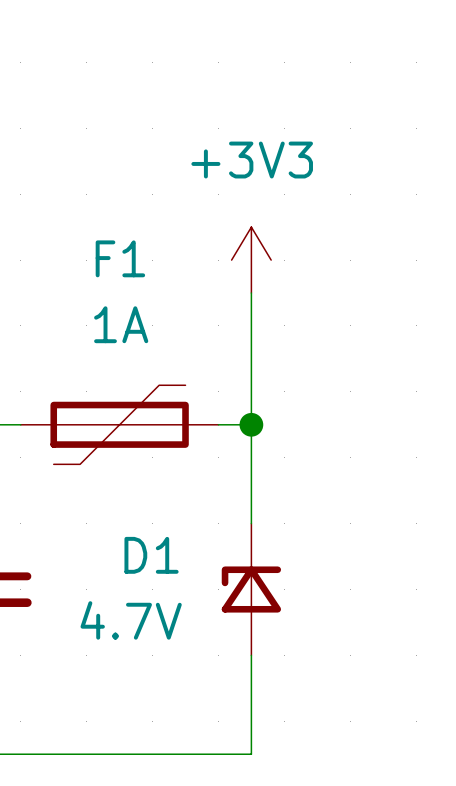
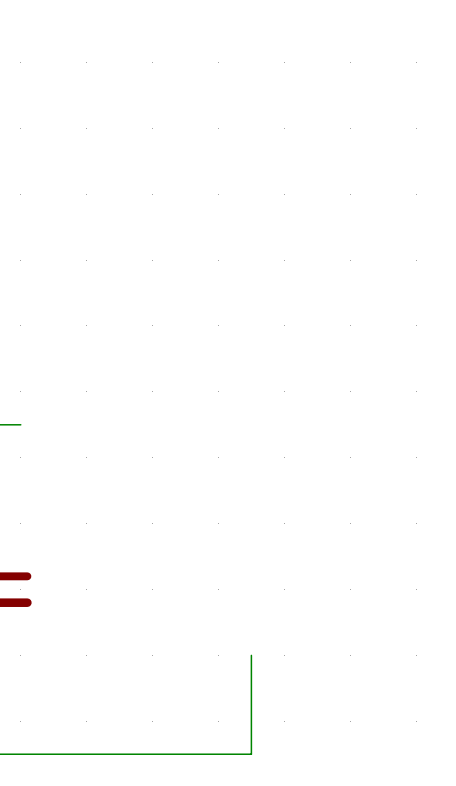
power symbol: +3V3 (251, 260) -> none
wire: (251, 293) (251, 523) -> none
F1: 1A (119, 424) -> none
wire: (218, 424) (251, 424) -> none
junction: (251, 424) -> none
D1: 4.7V (251, 589) -> none

